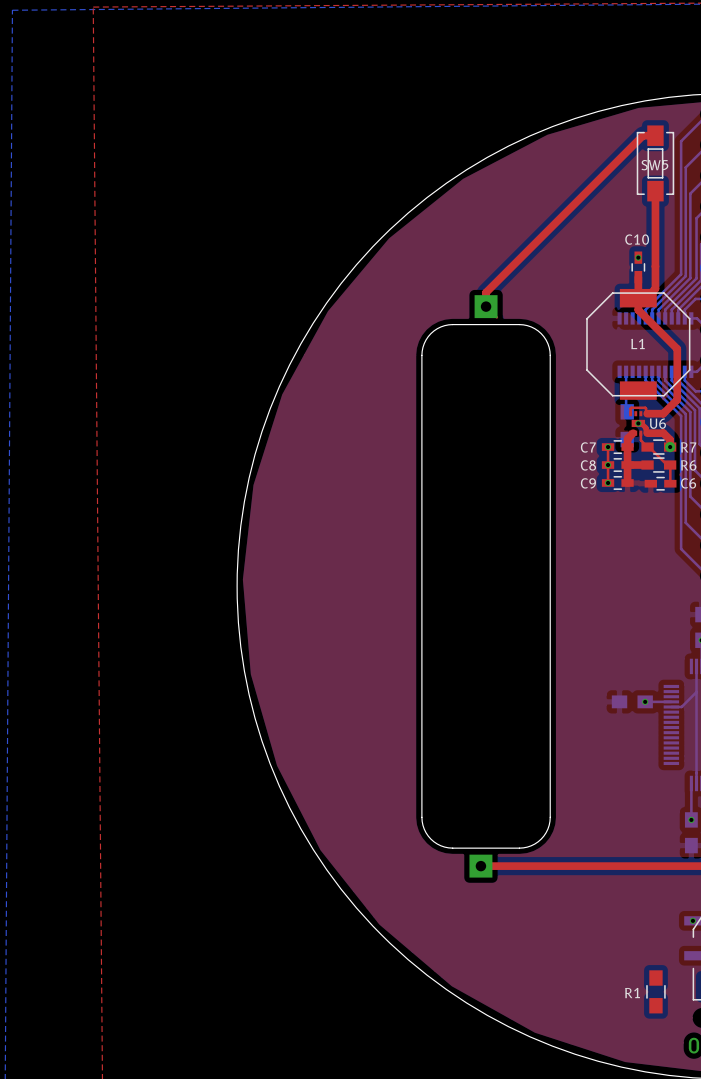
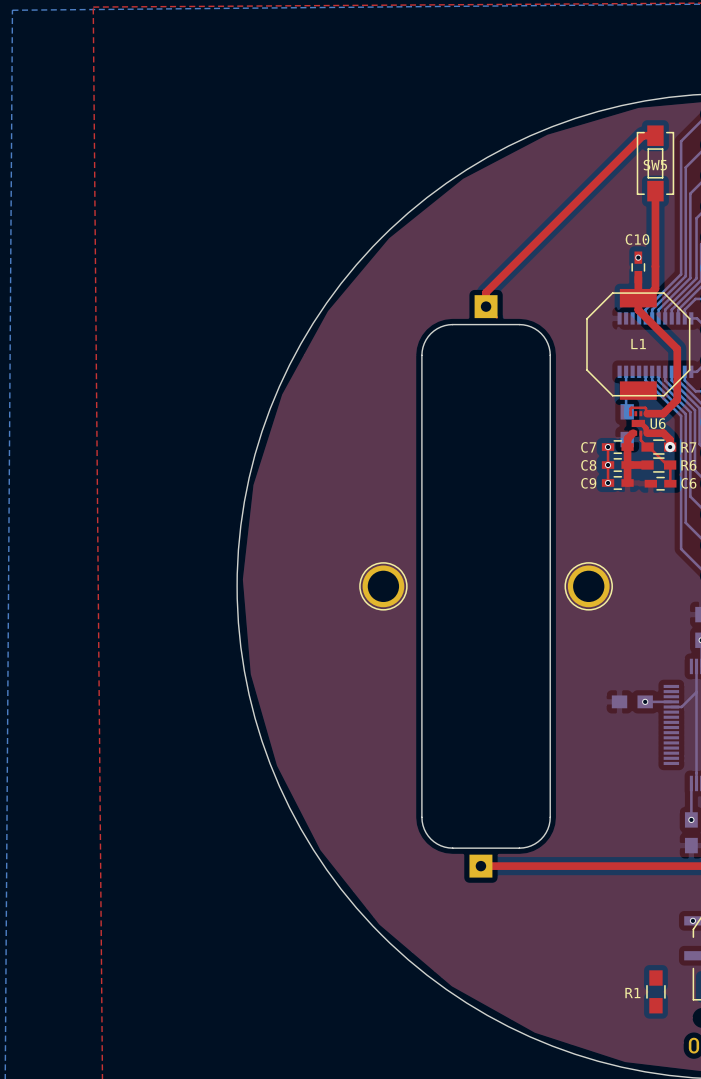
via: (638, 423) -> none
part: none -> (383, 586)
part: none -> (588, 586)

